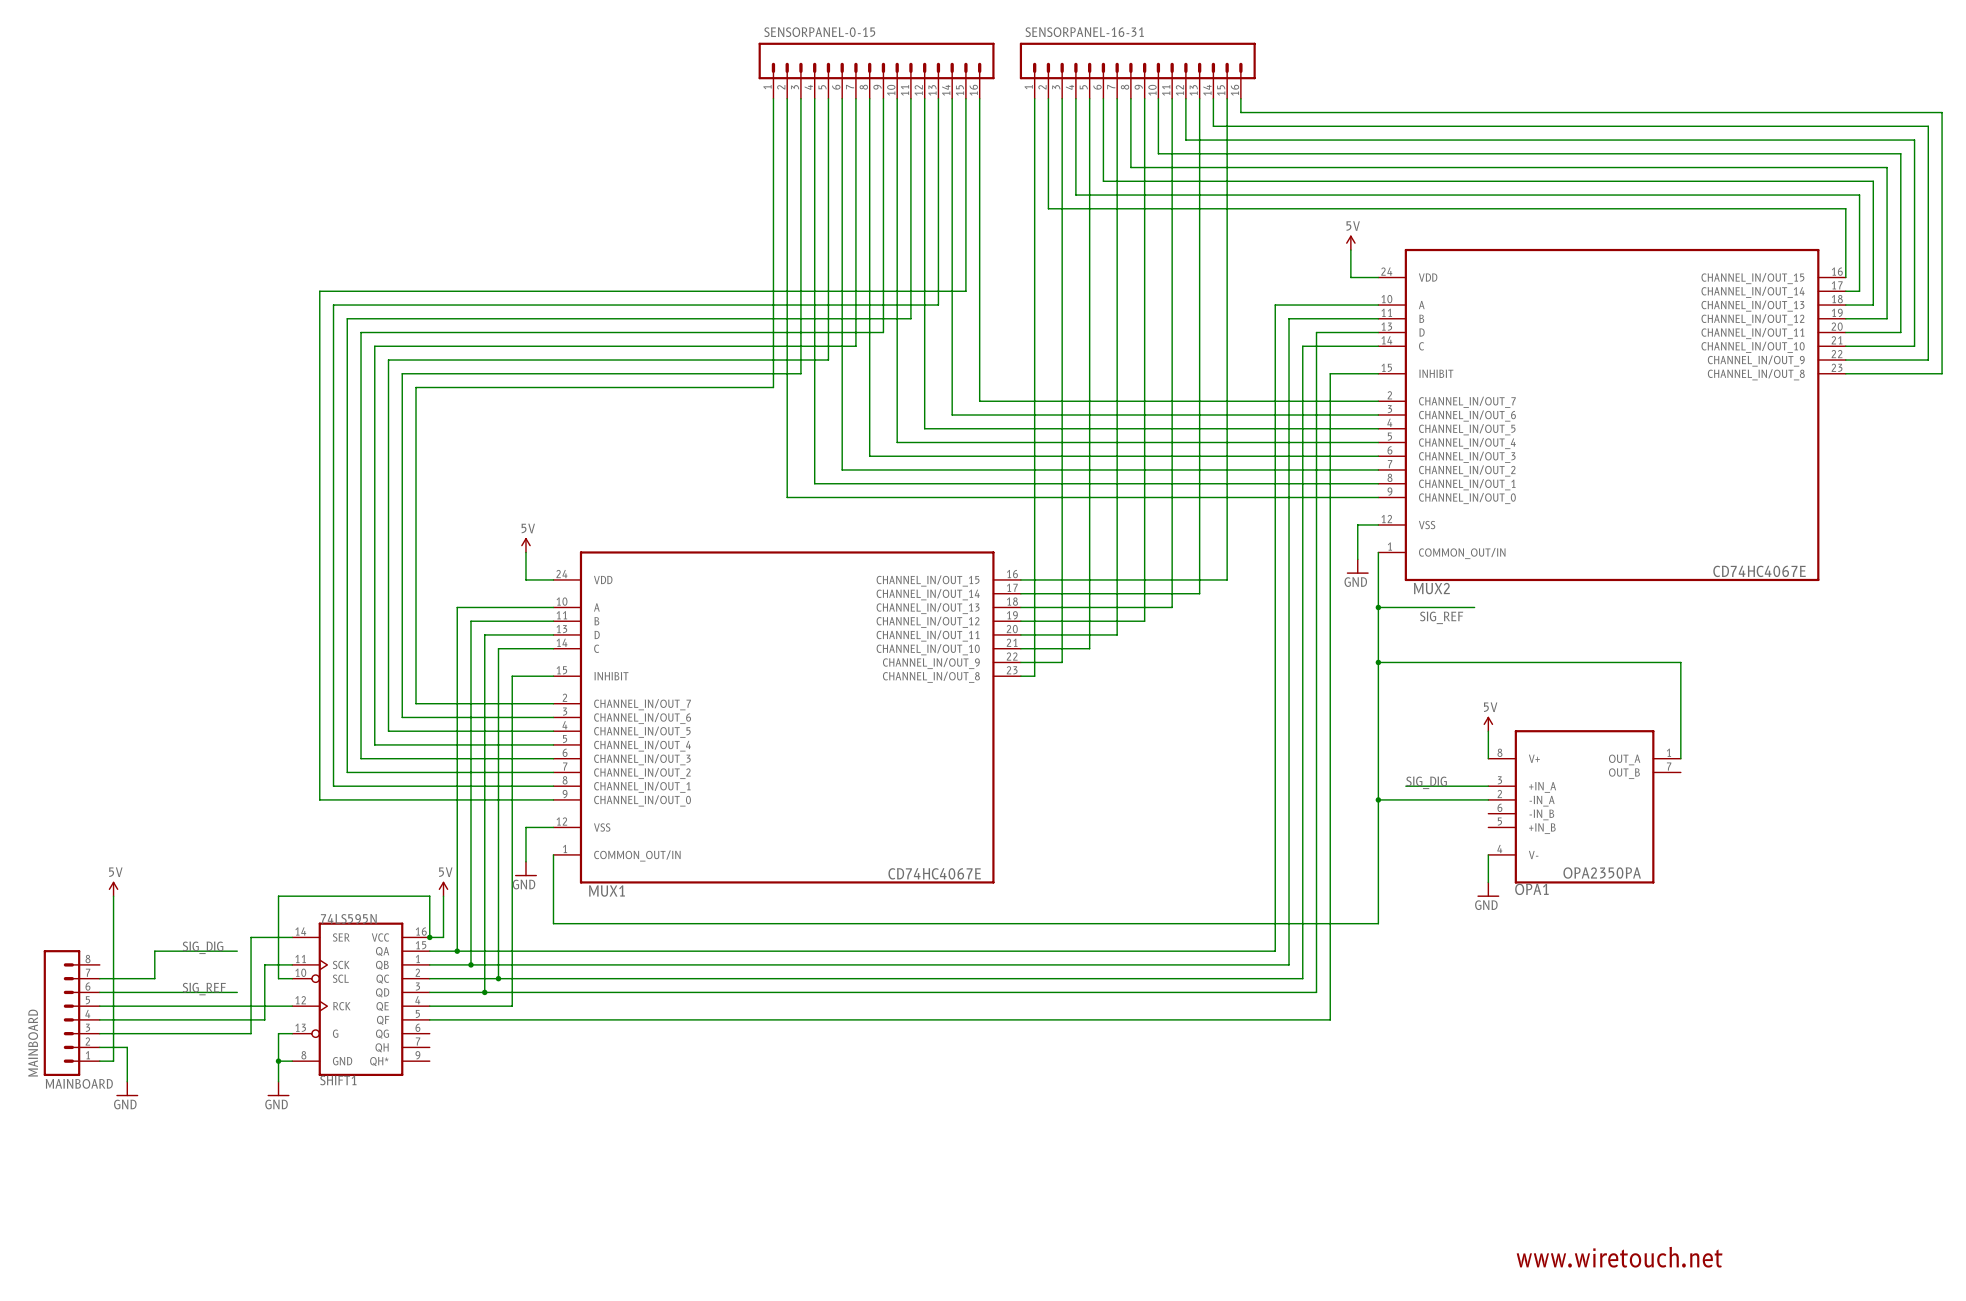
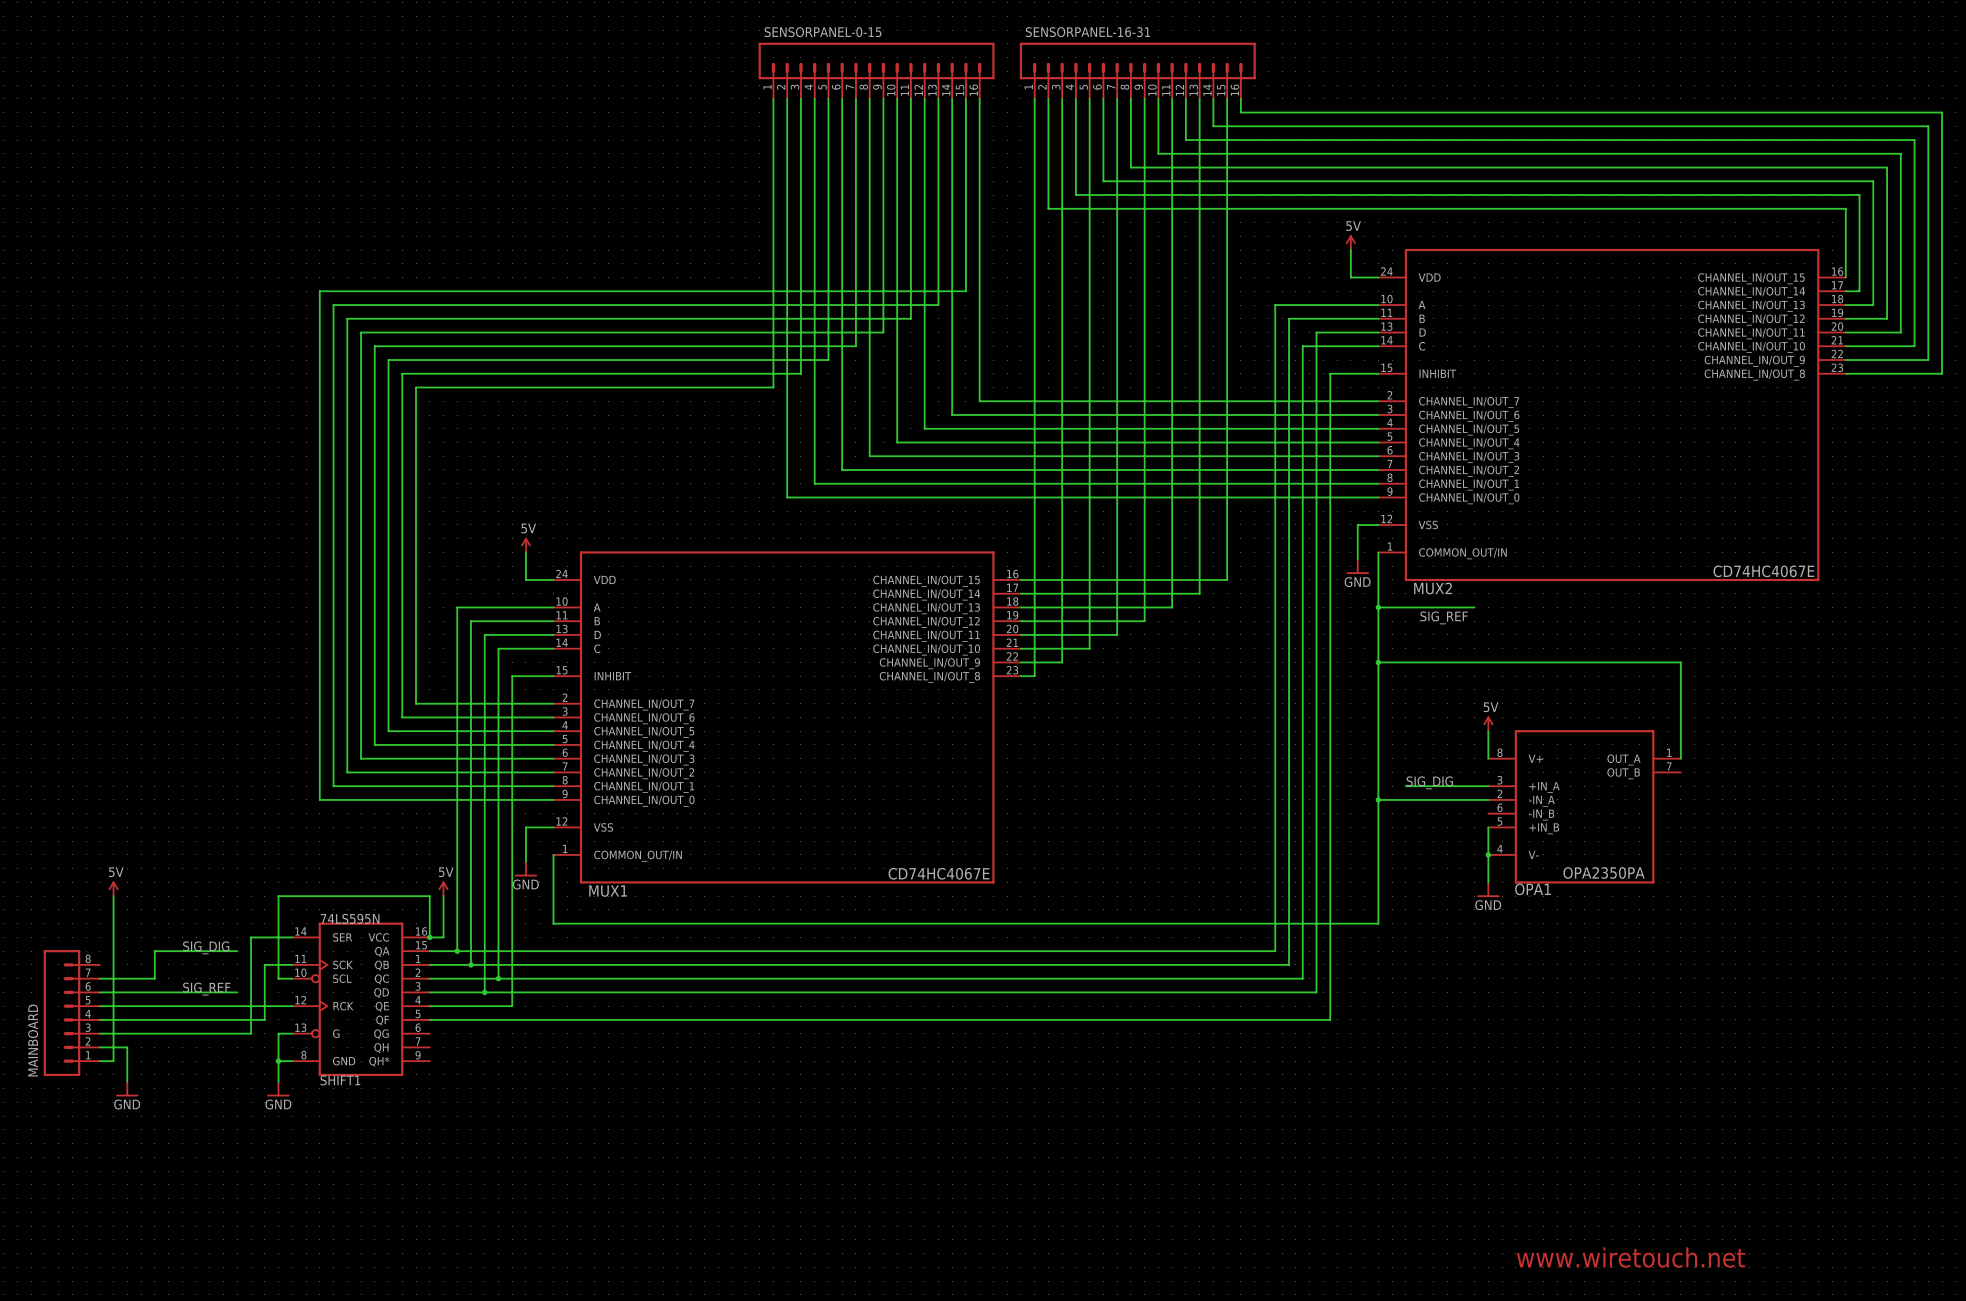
wire: none -> (1488, 827) (1488, 854)
junction: none -> (1488, 854)
MAINBOARD value: MAINBOARD (79, 1083) -> none

